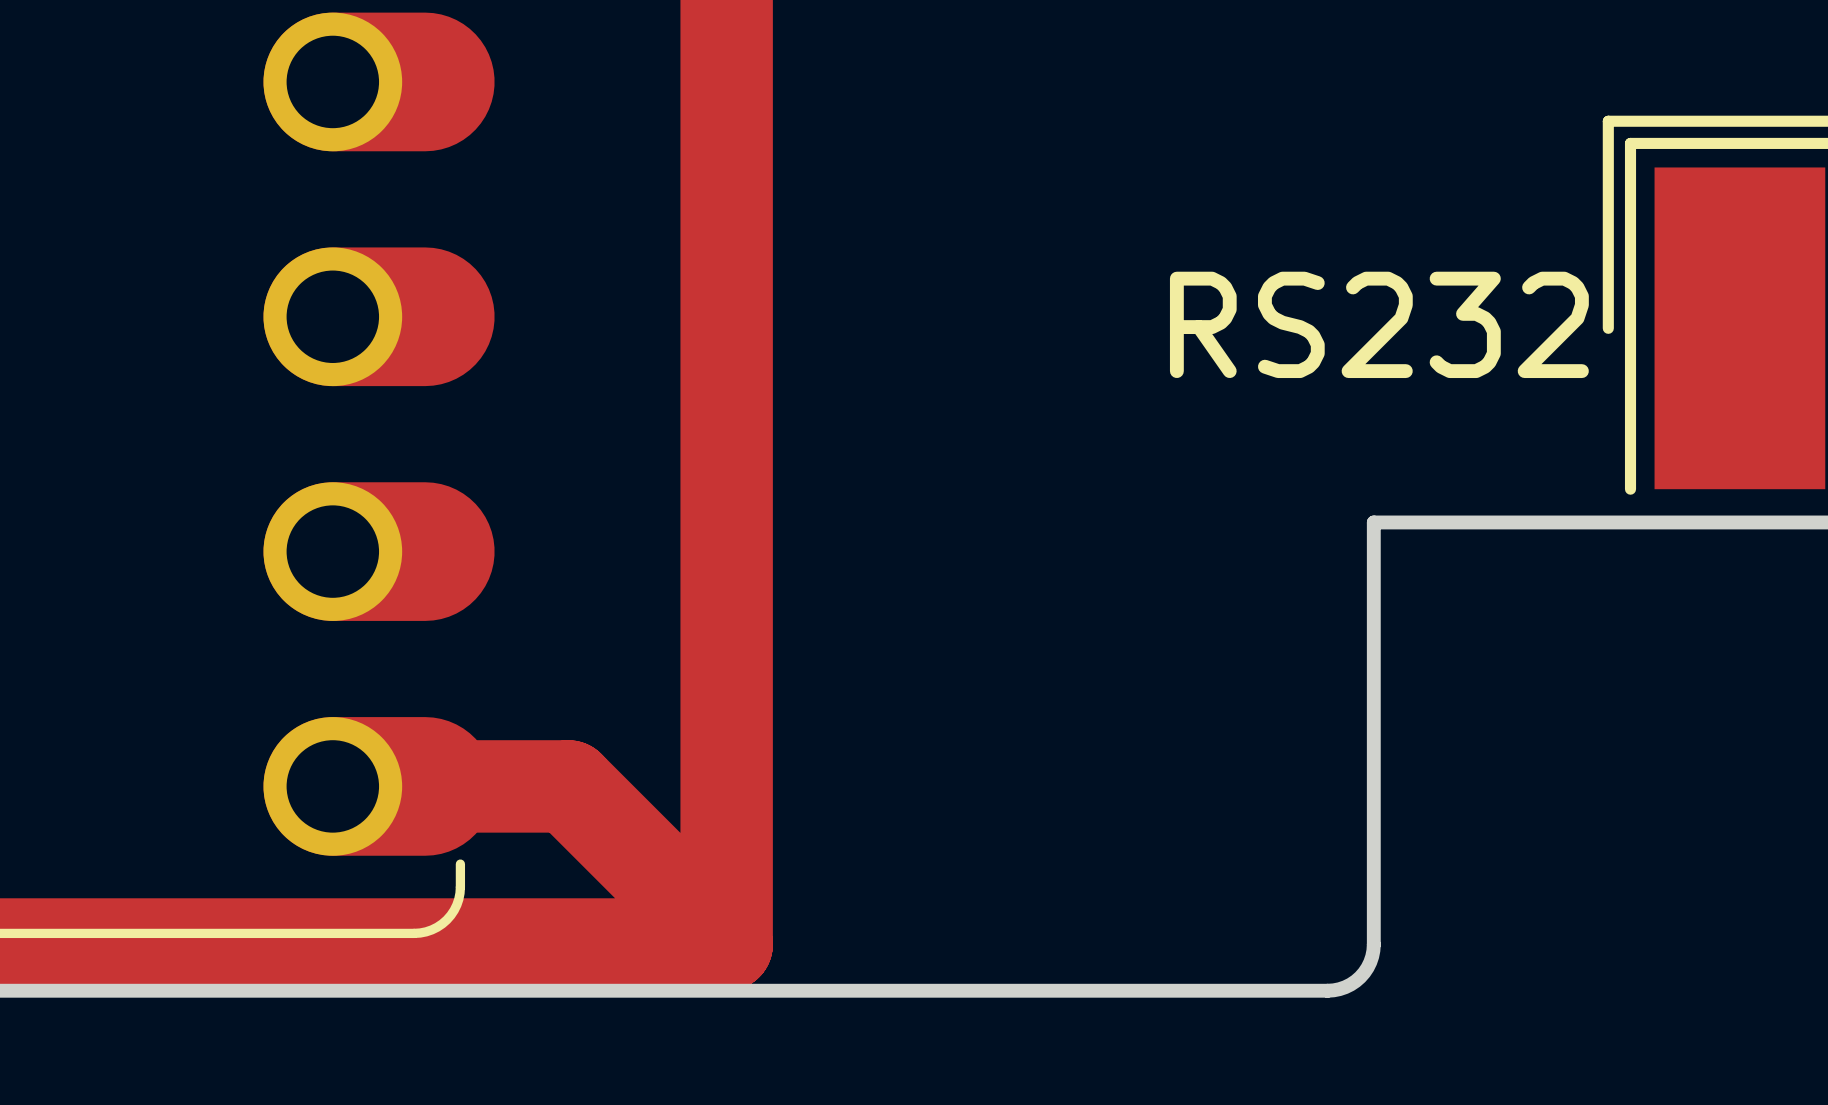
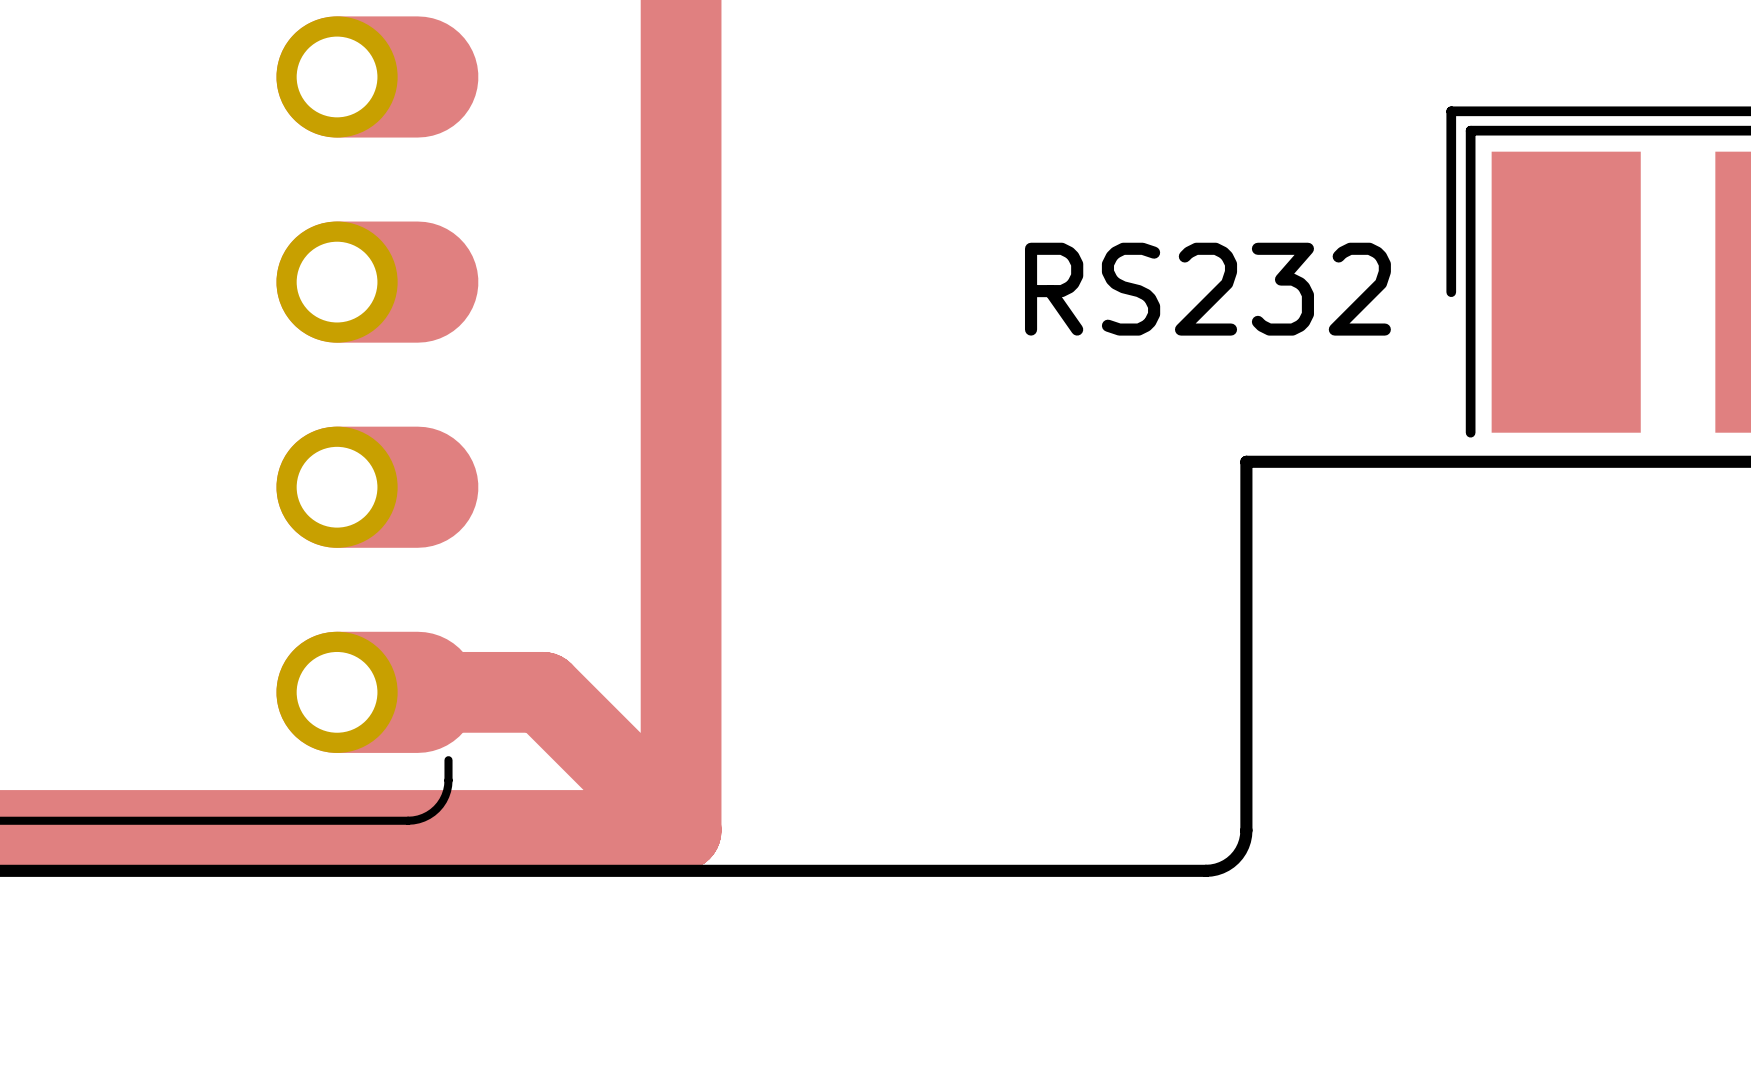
RS232 name position: RS232 (1379, 324) -> RS232 (1207, 289)

